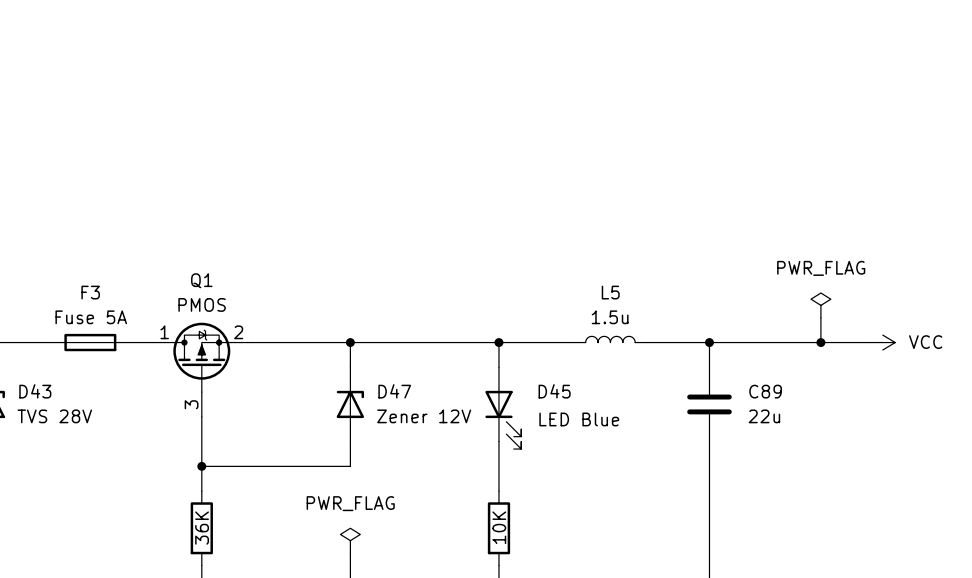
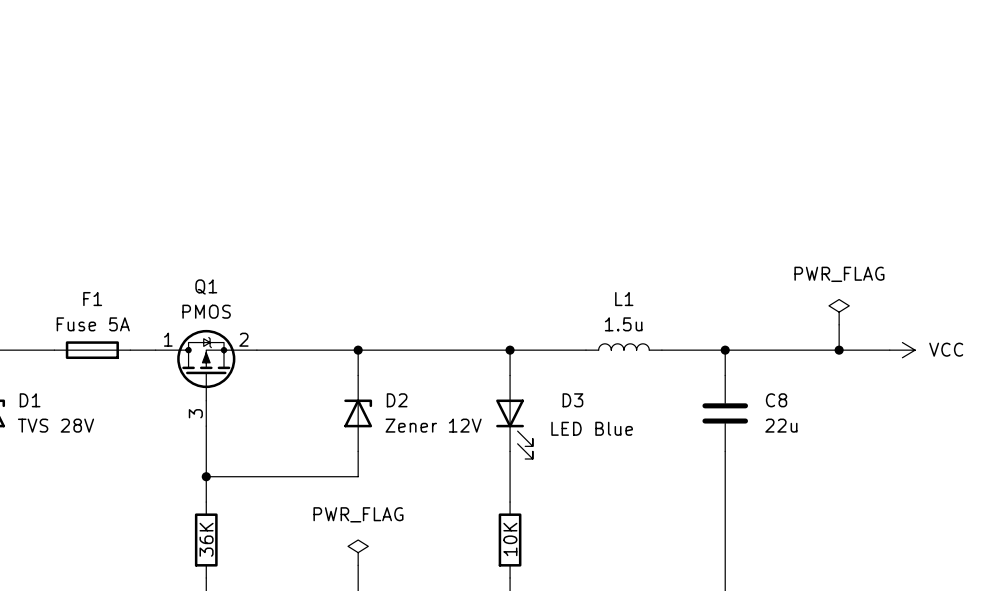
F3 name: F3 (90, 292) -> F1 (92, 299)
L5 name: L5 (610, 292) -> L1 (624, 299)
D43 name: D43 (35, 391) -> D1 (30, 400)
D47 name: D47 (394, 391) -> D2 (397, 400)
D45 name: D45 (554, 391) -> D3 (572, 400)
C89 name: C89 (765, 391) -> C8 (776, 400)

